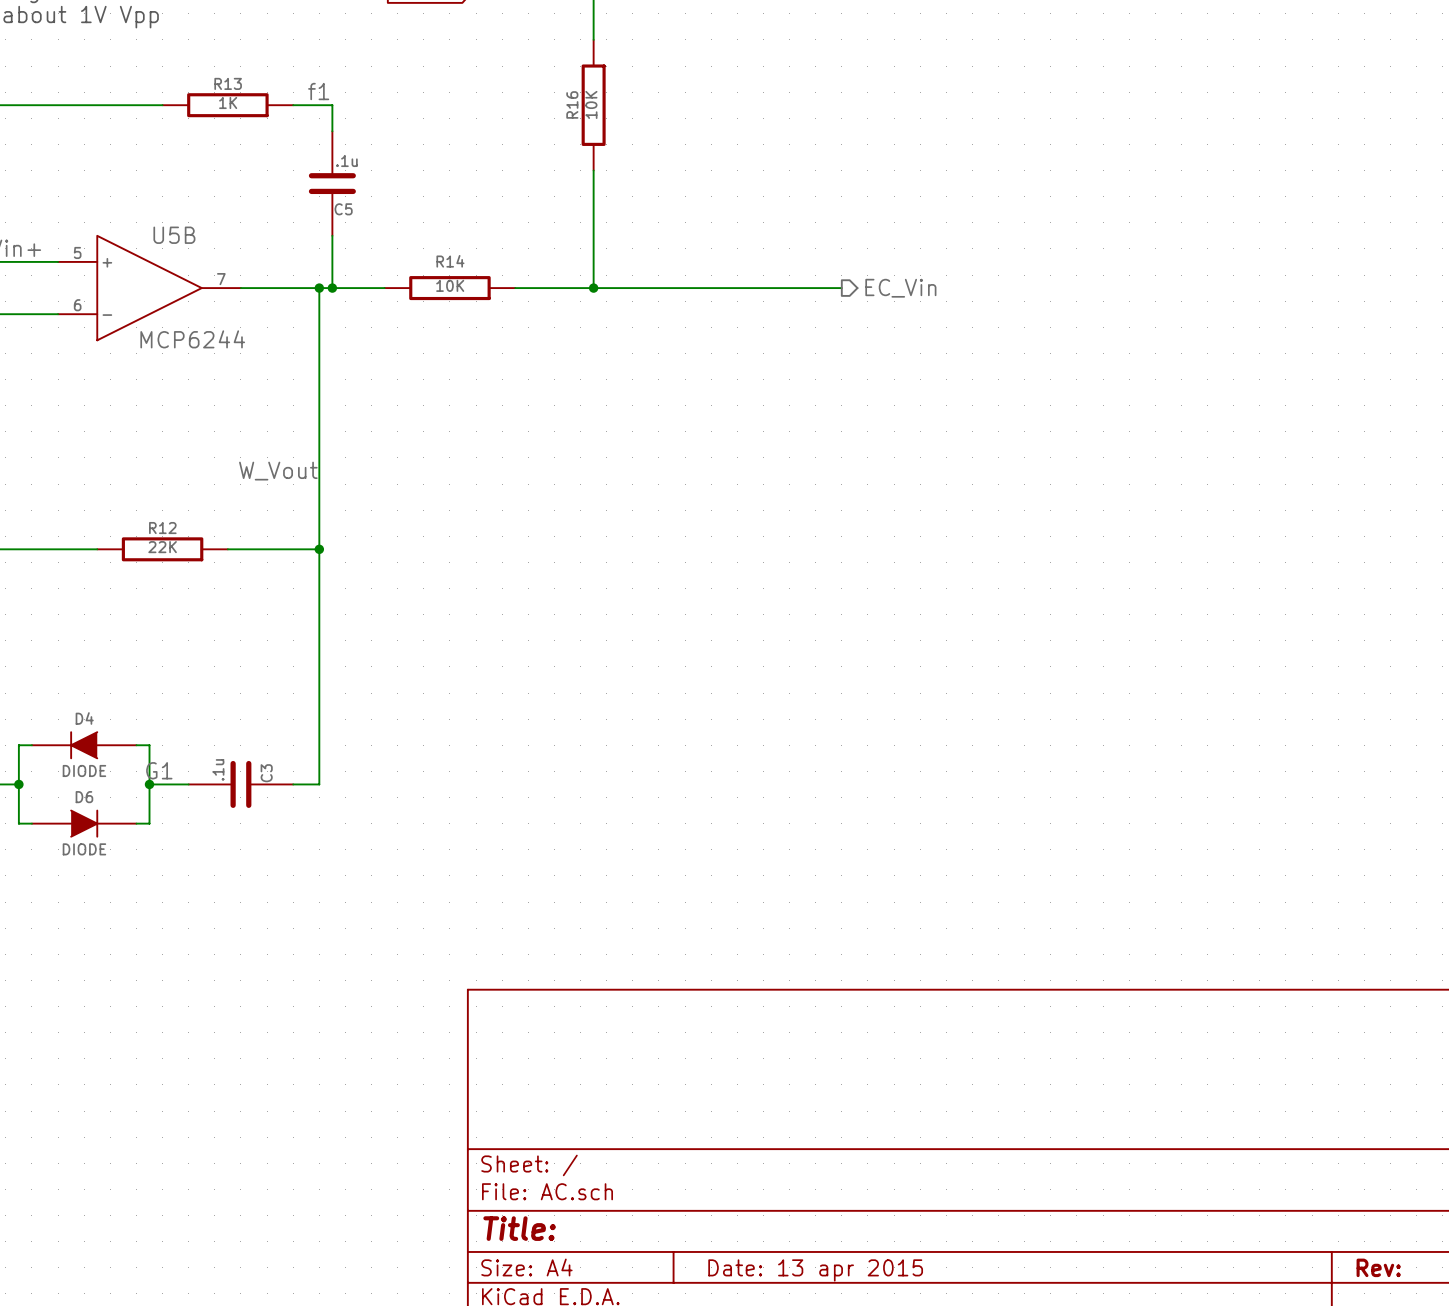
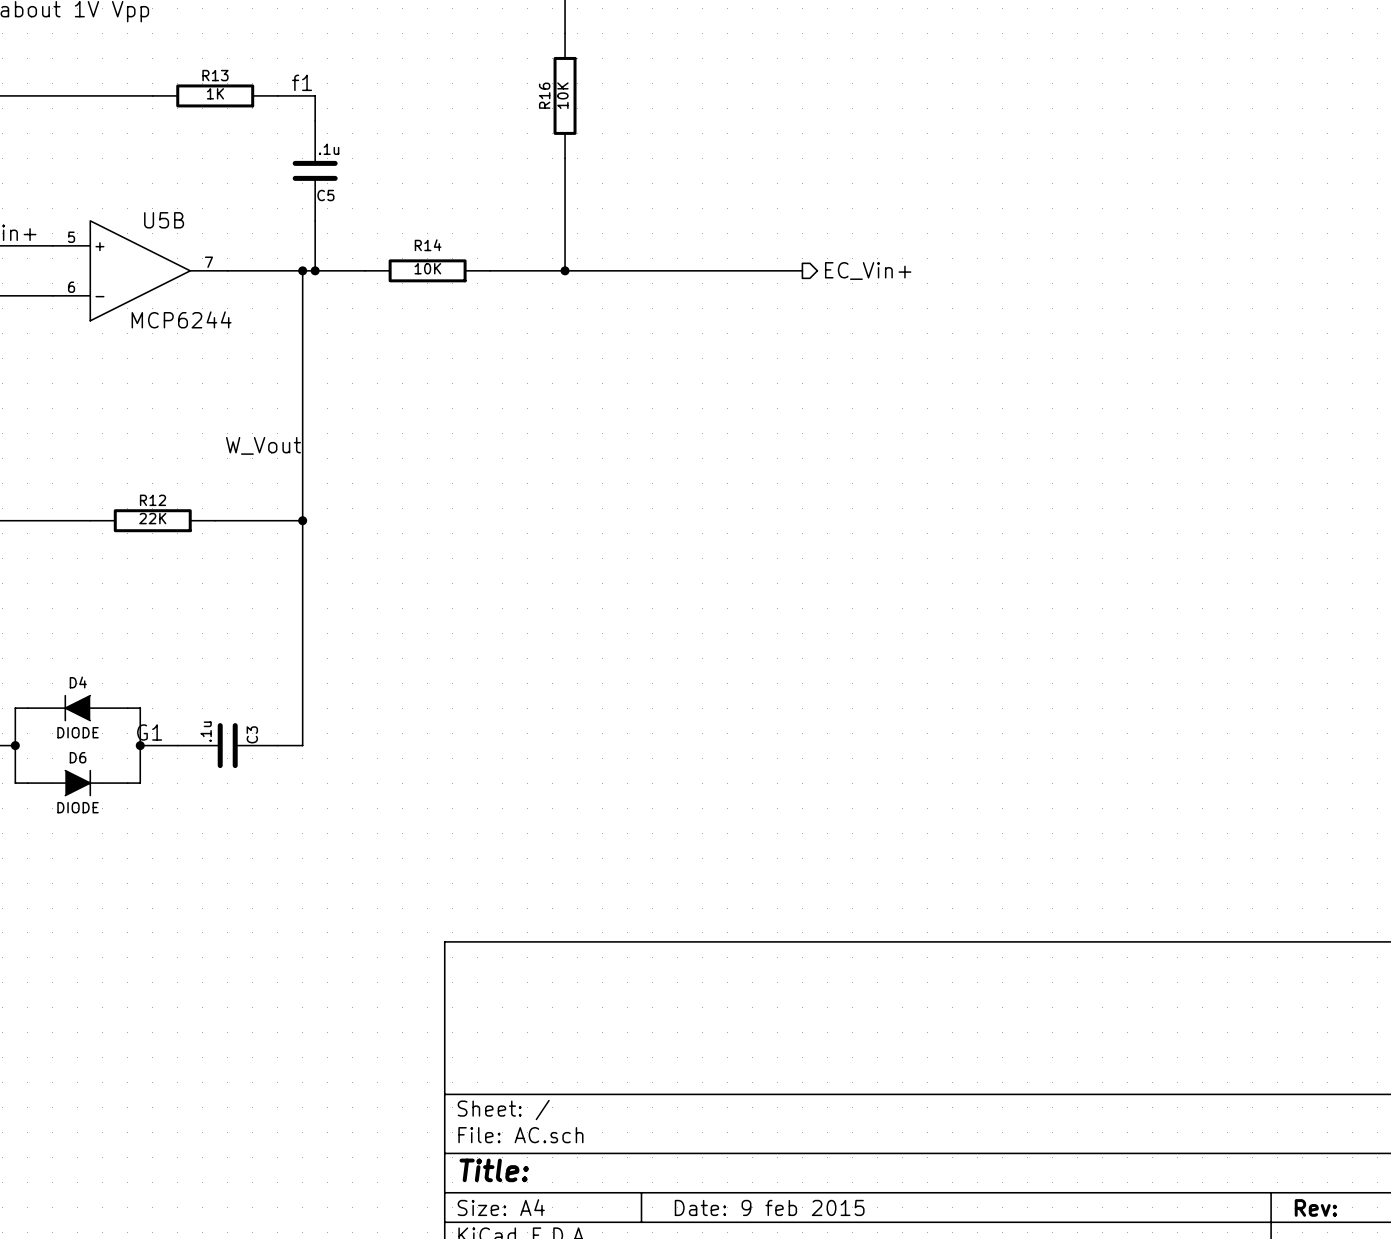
hierarchical label: EC_Vin (900, 288) -> EC_Vin+ (868, 270)
title block: Date: 13 apr 2015 (815, 1270) -> Date: 9 feb 2015 (769, 1207)

